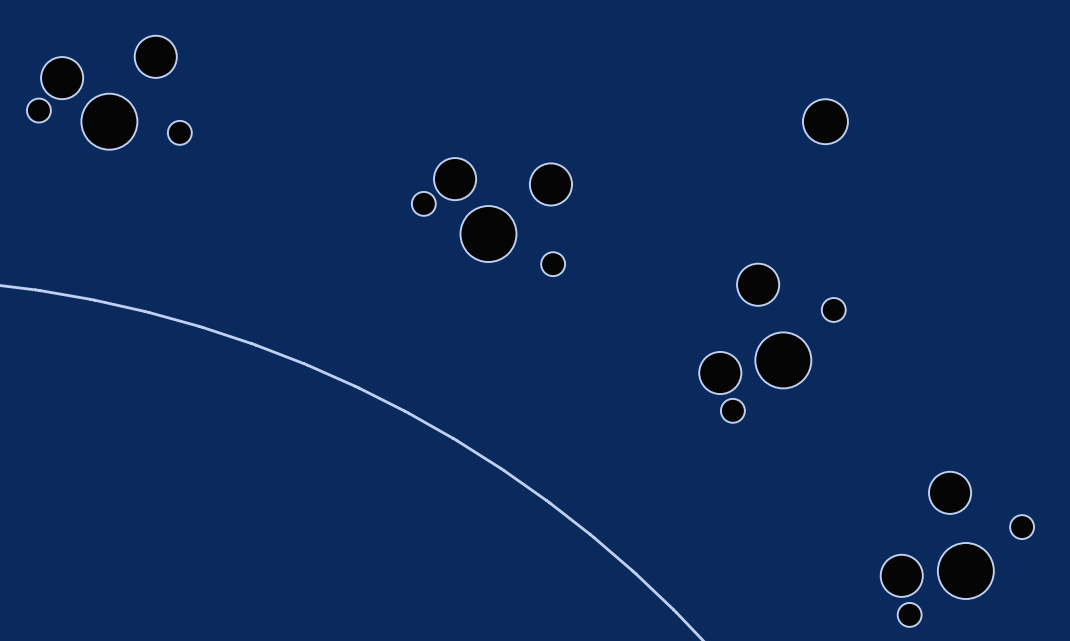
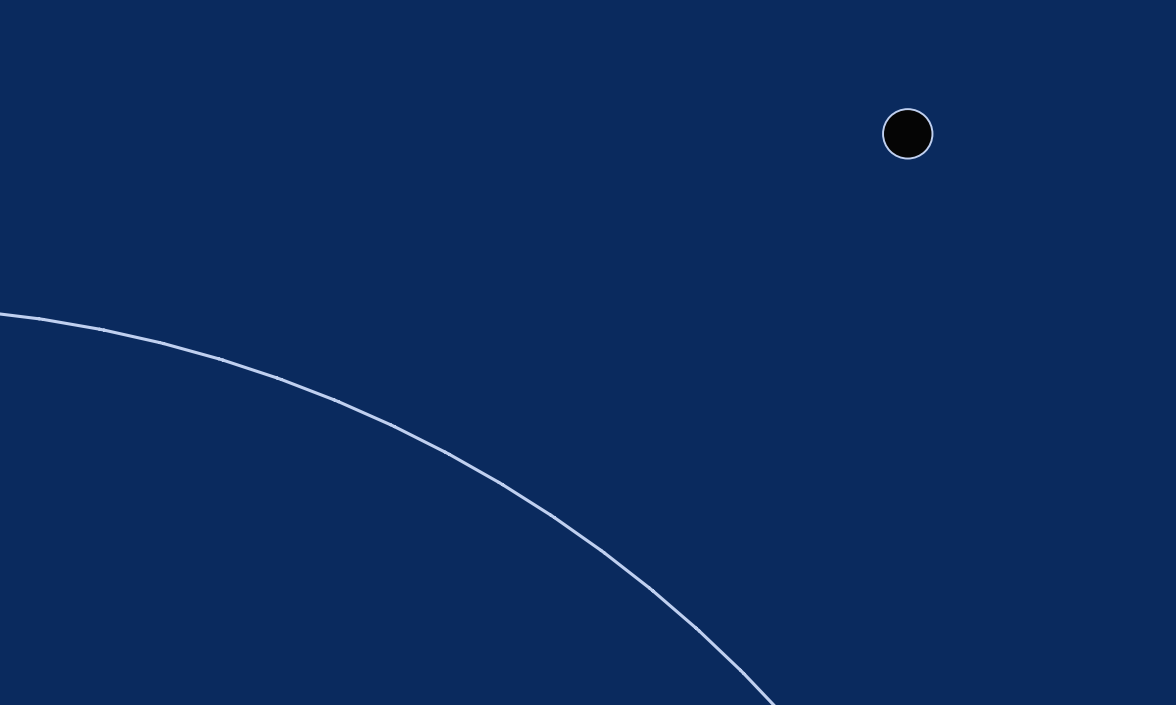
part: (109, 92) -> none
part: (491, 217) -> none
part: (772, 343) -> none
part: (957, 549) -> none

